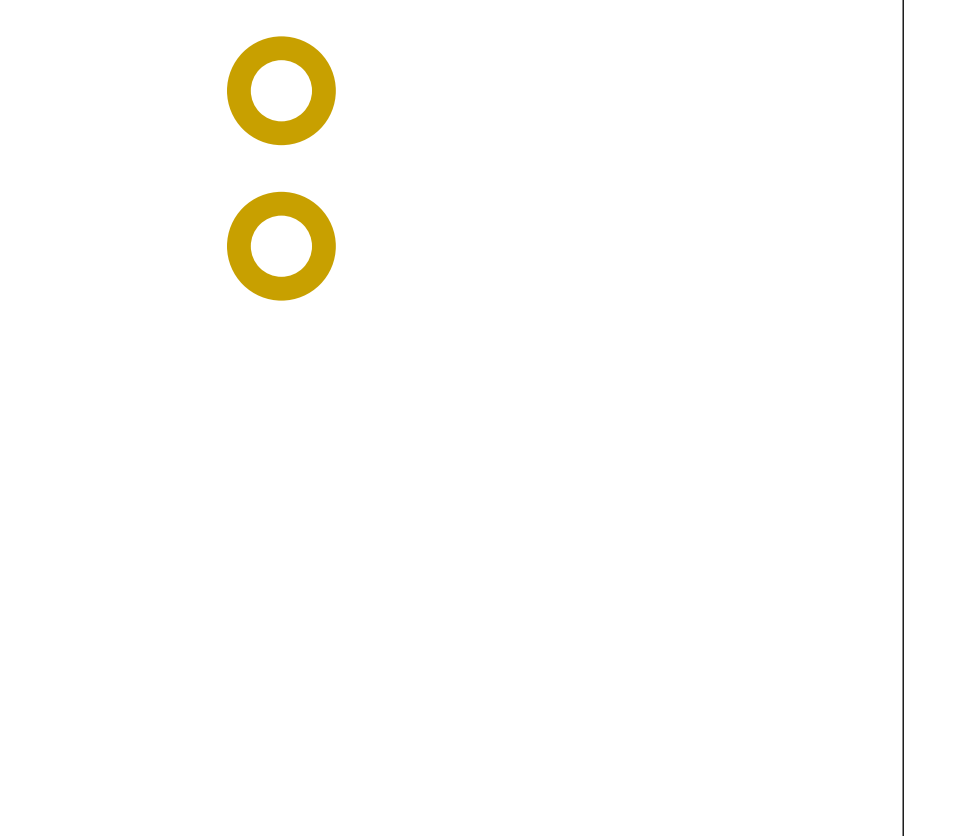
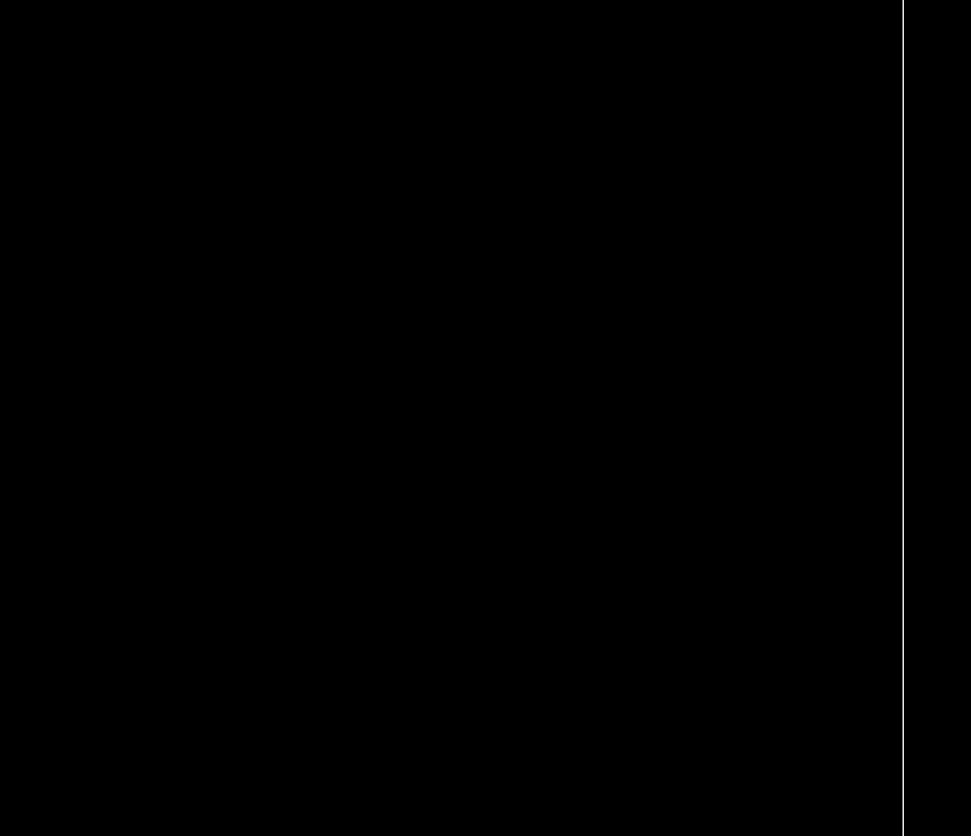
part: (281, 168) -> none

